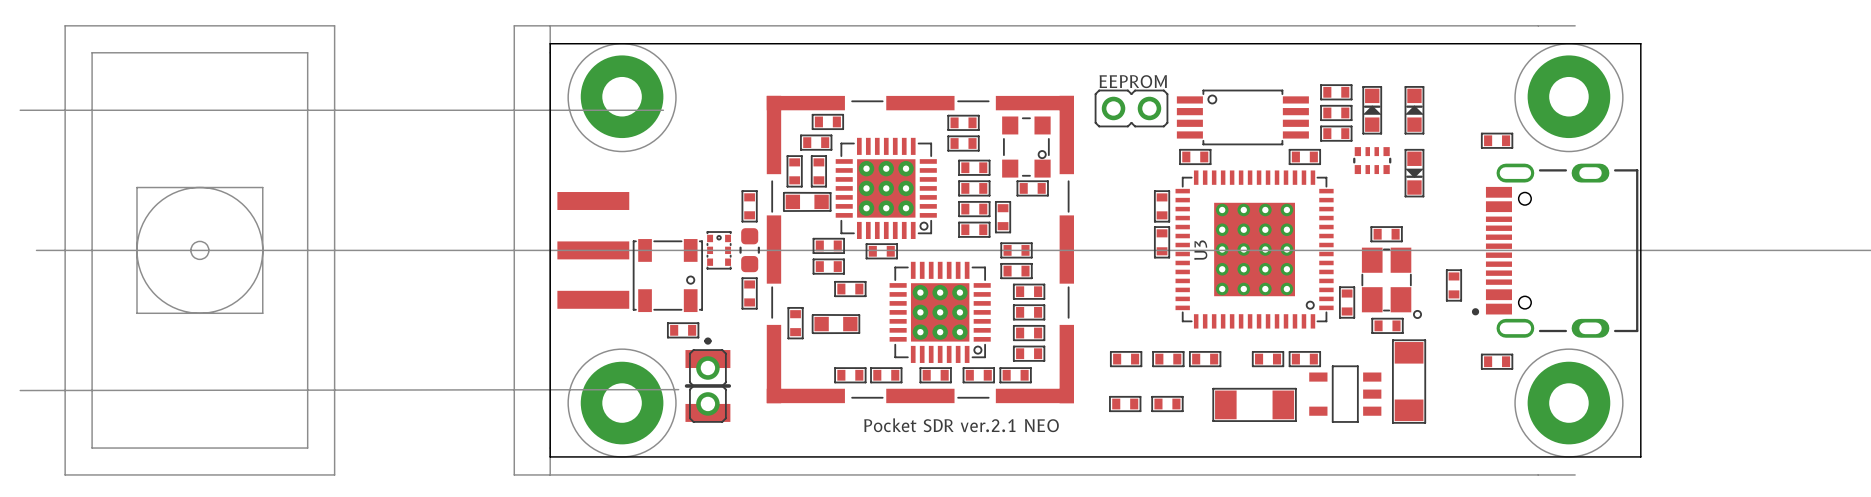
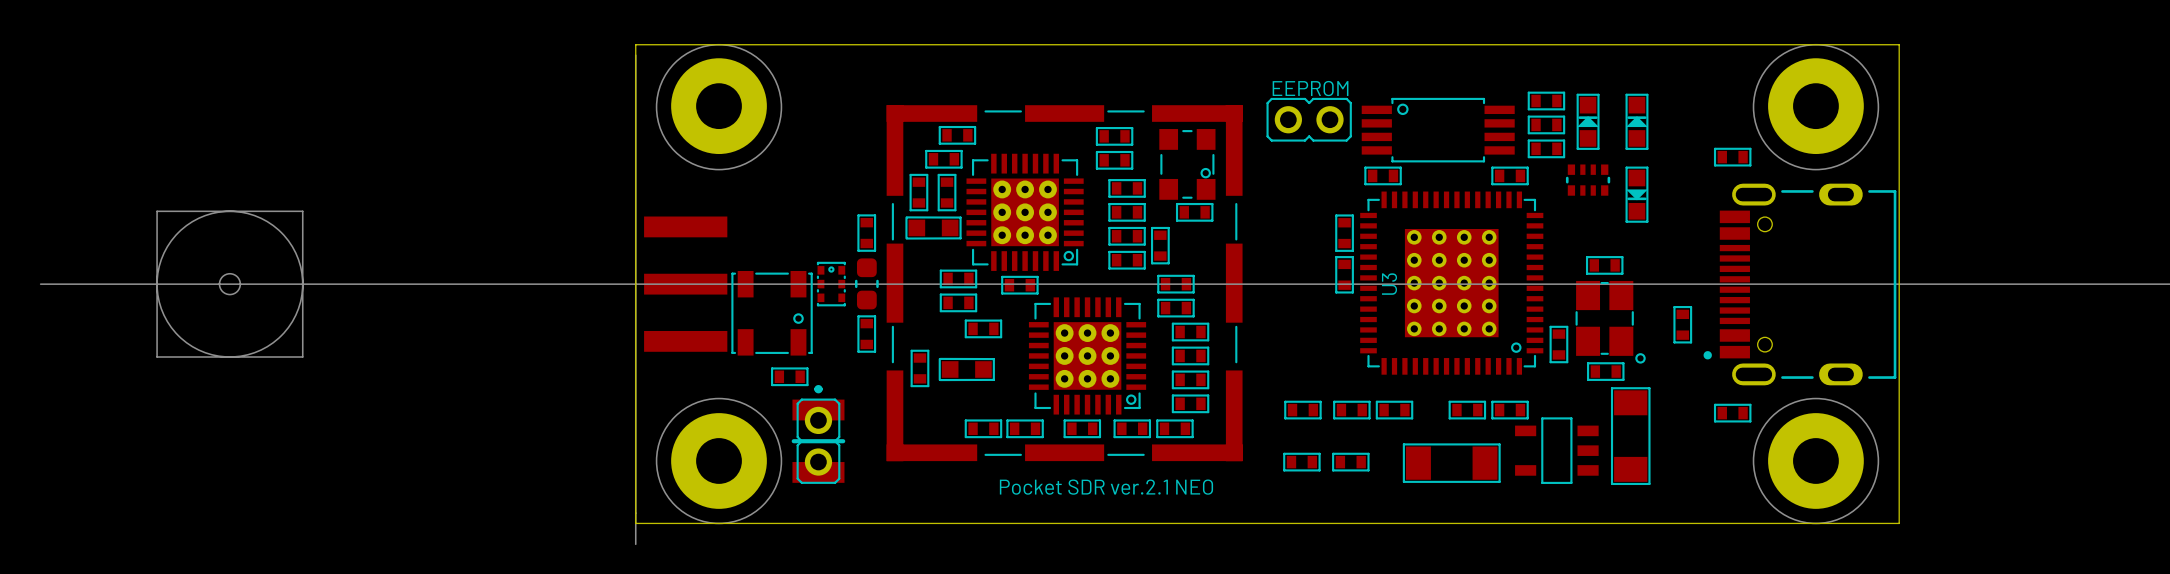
line: (65, 25) (65, 474) (334, 474) (334, 25) (65, 25) -> none
line: (550, 25) (550, 52) -> none
line: (1575, 25) (514, 25) (514, 474) (1575, 474) -> none
line: (92, 52) (92, 448) (307, 448) (307, 52) (92, 52) -> none
line: (20, 110) (663, 110) -> none
line: (678, 389) (20, 390) -> none

